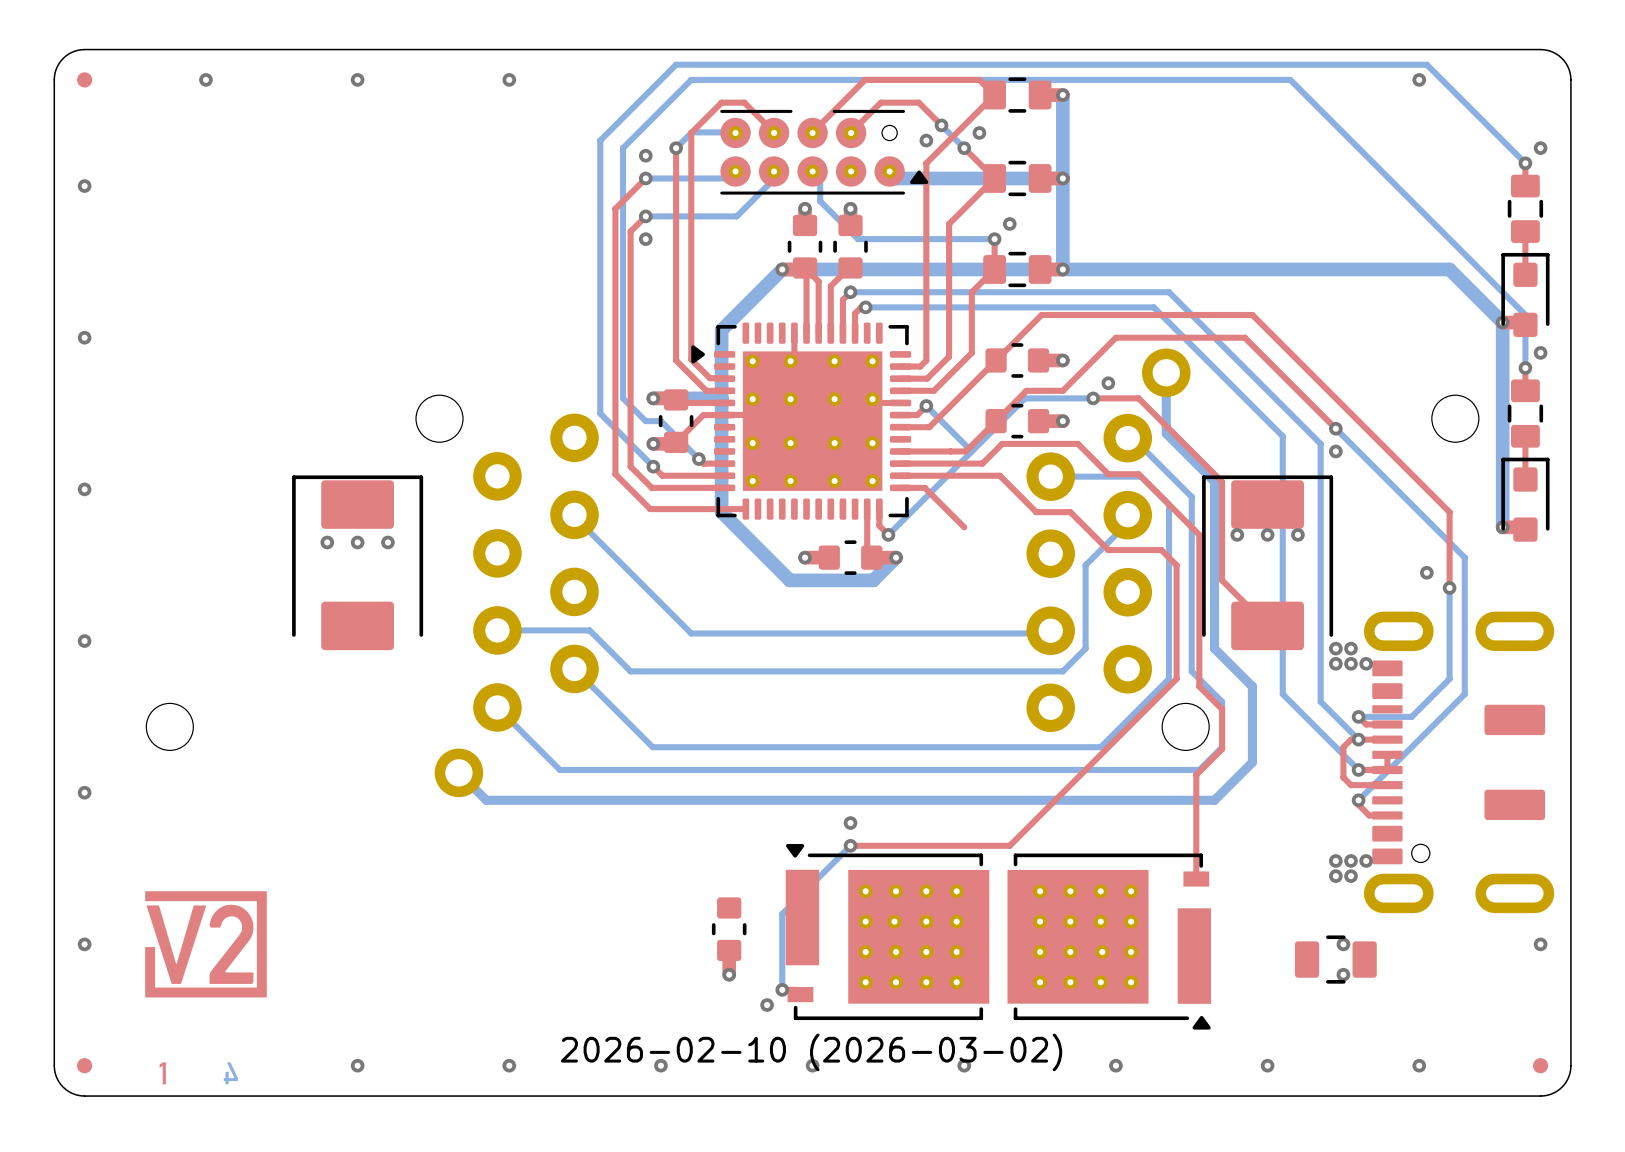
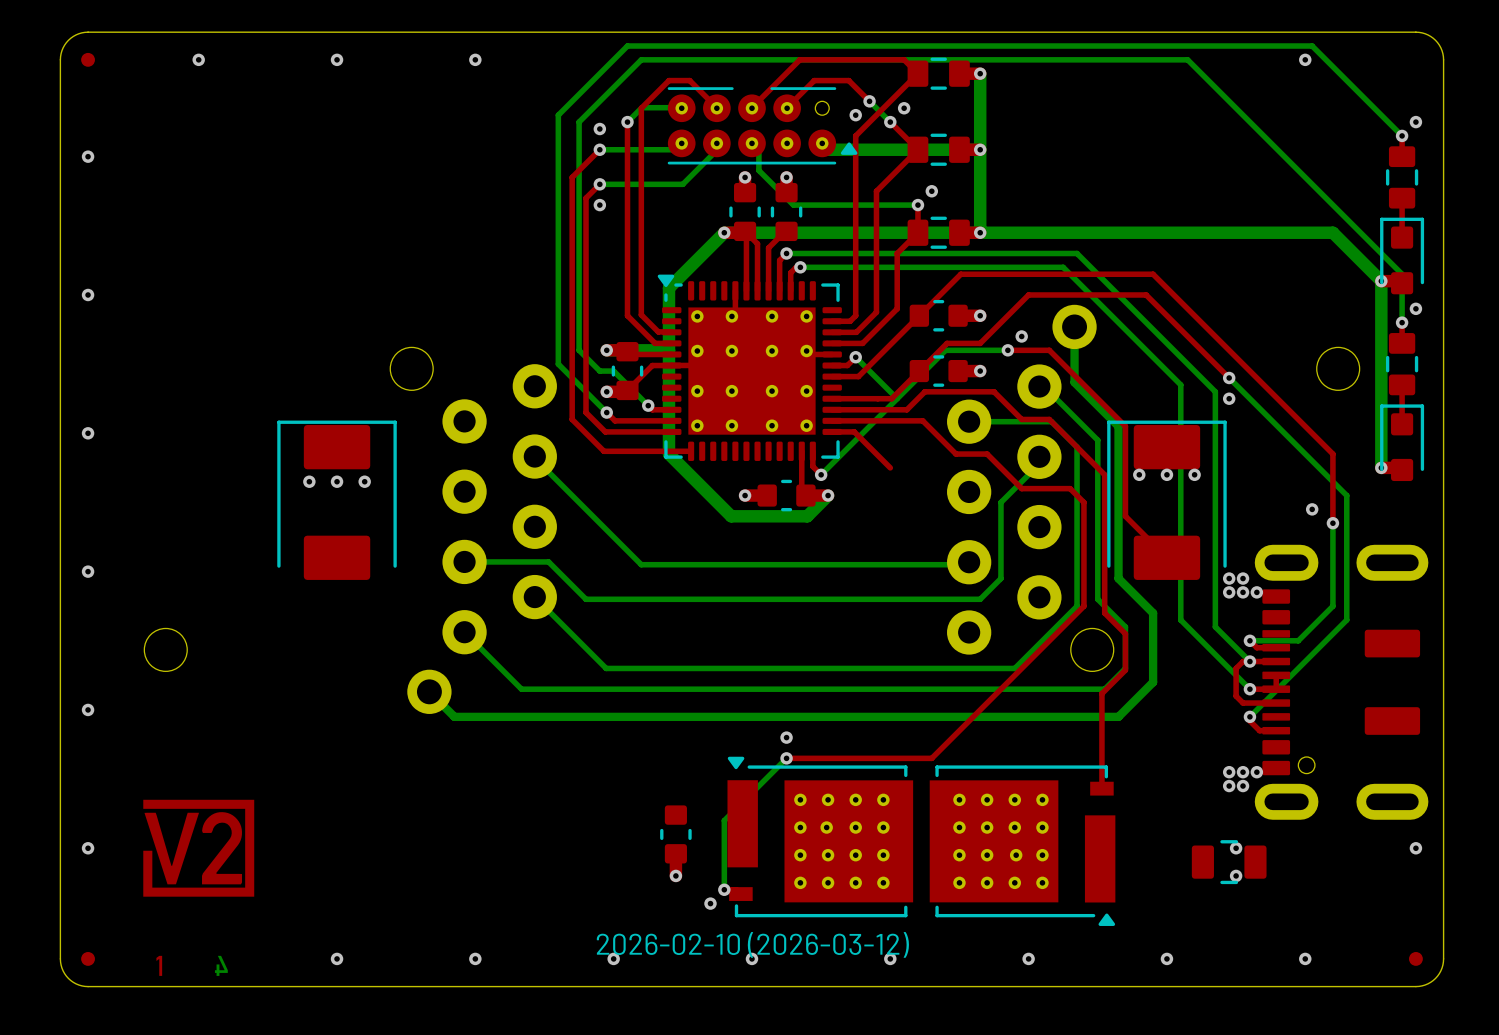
part footprint: [691, 322, 912, 520] -> [657, 274, 842, 461]
drawing shape: [560, 1033, 1063, 1072] -> [596, 932, 909, 958]

